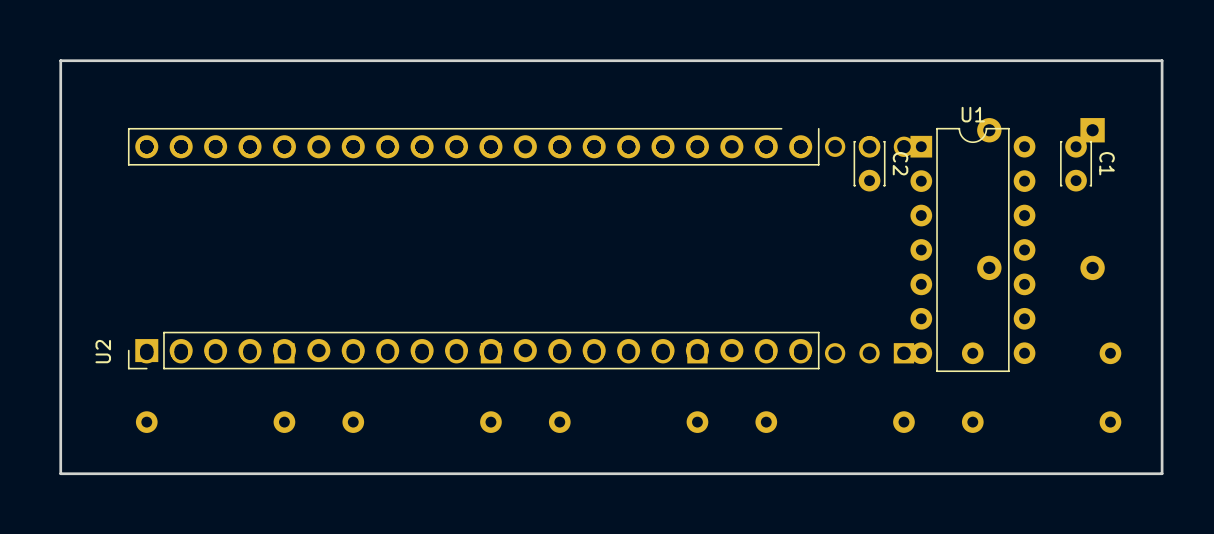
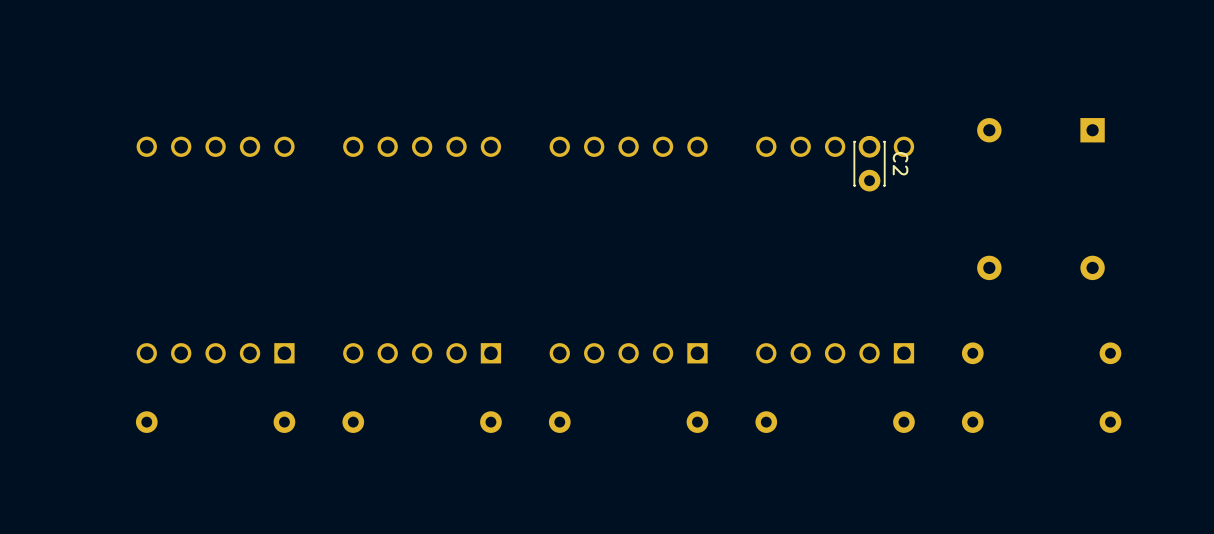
board edge: (1162, 60) (60, 60) (60, 473) (1162, 473) (1162, 60) -> none
C1: (1076, 163) -> none
U2: (473, 248) -> none
U1: (972, 249) -> none

